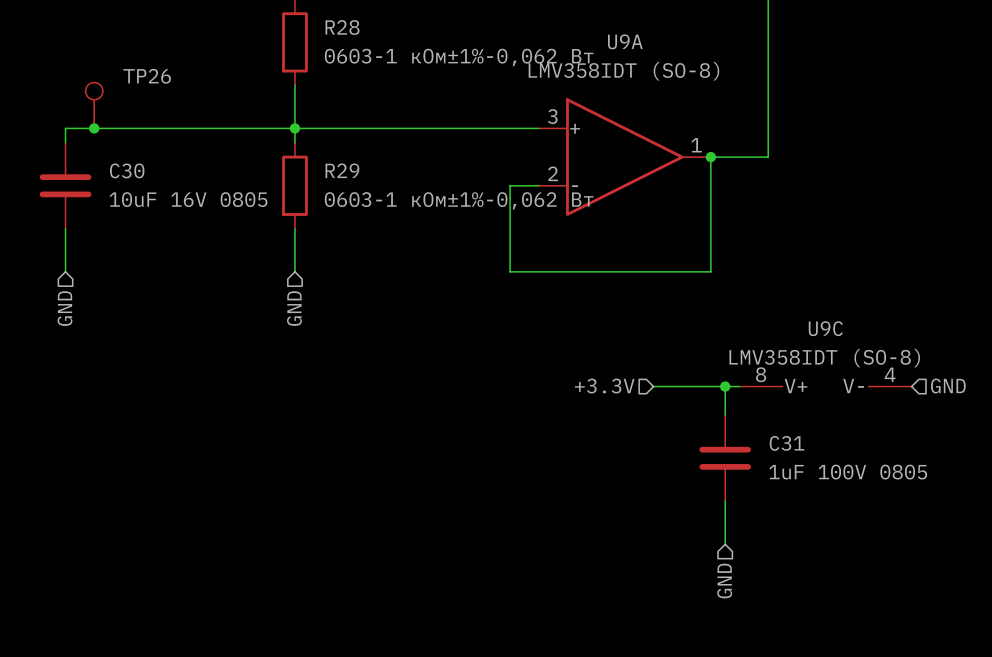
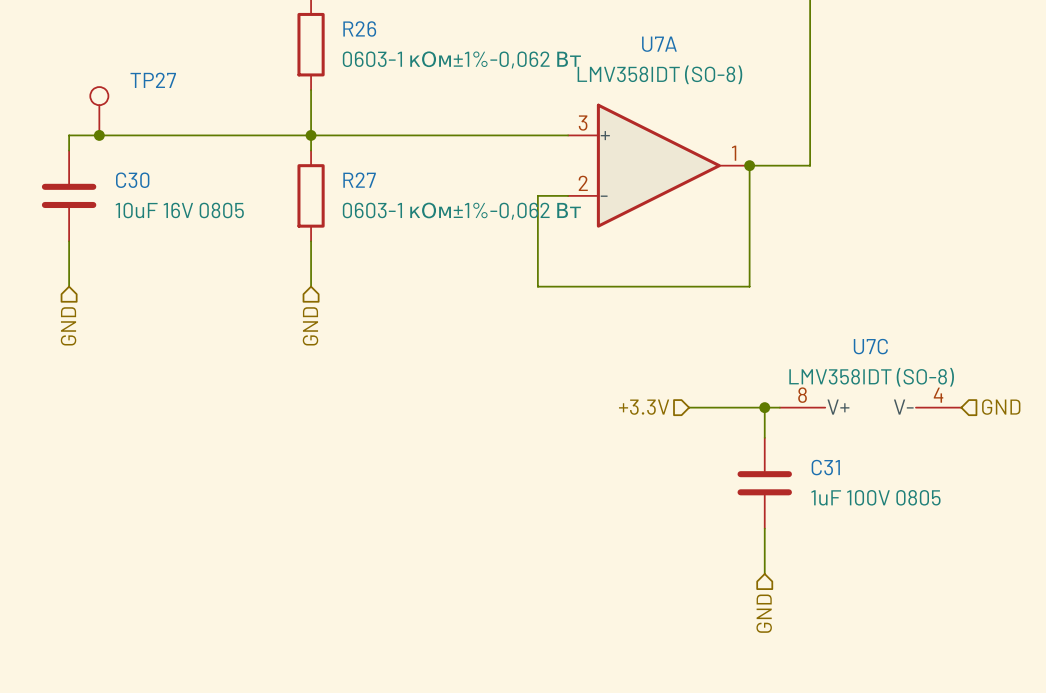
R28 name: R28 (342, 27) -> R26 (359, 28)
U9A name: U9A (625, 41) -> U7A (659, 44)
TP26 name: TP26 (147, 76) -> TP27 (153, 80)
R29 name: R29 (342, 170) -> R27 (359, 180)
U9C name: U9C (825, 328) -> U7C (870, 346)

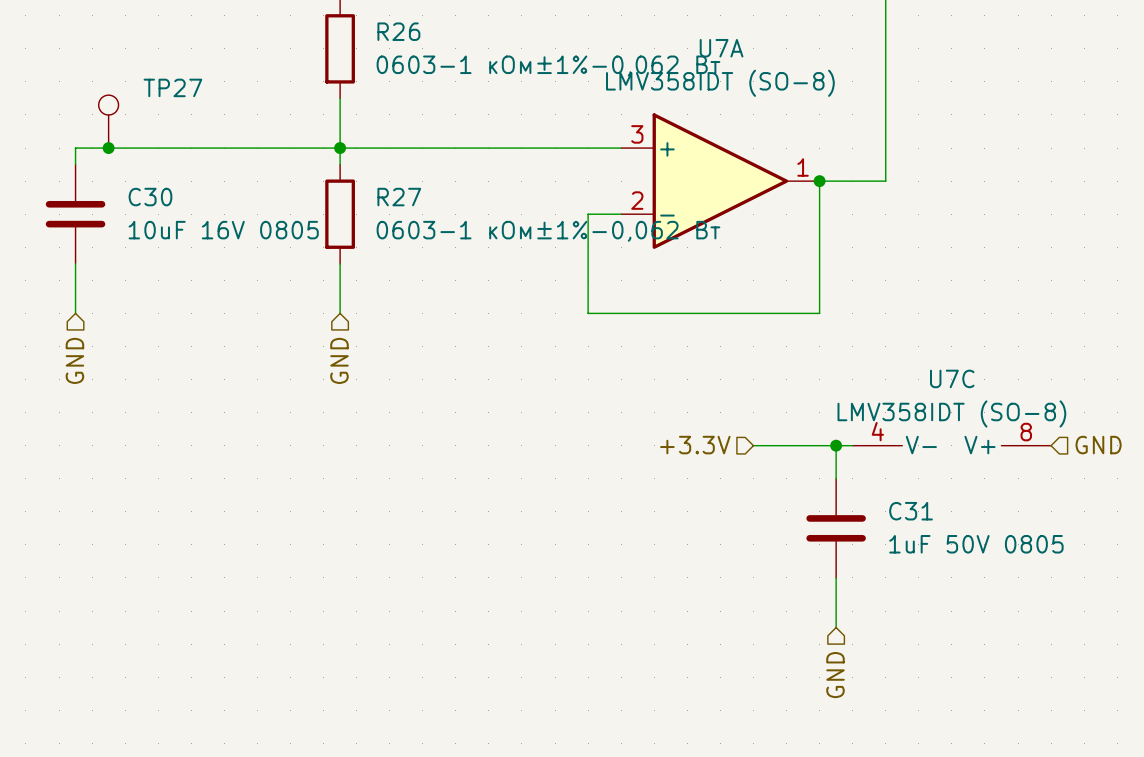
U7C rotation: 0° (870, 407) -> 180° (951, 445)
C31 value: 1uF 100V 0805 (875, 497) -> 1uF 50V 0805 (976, 544)

